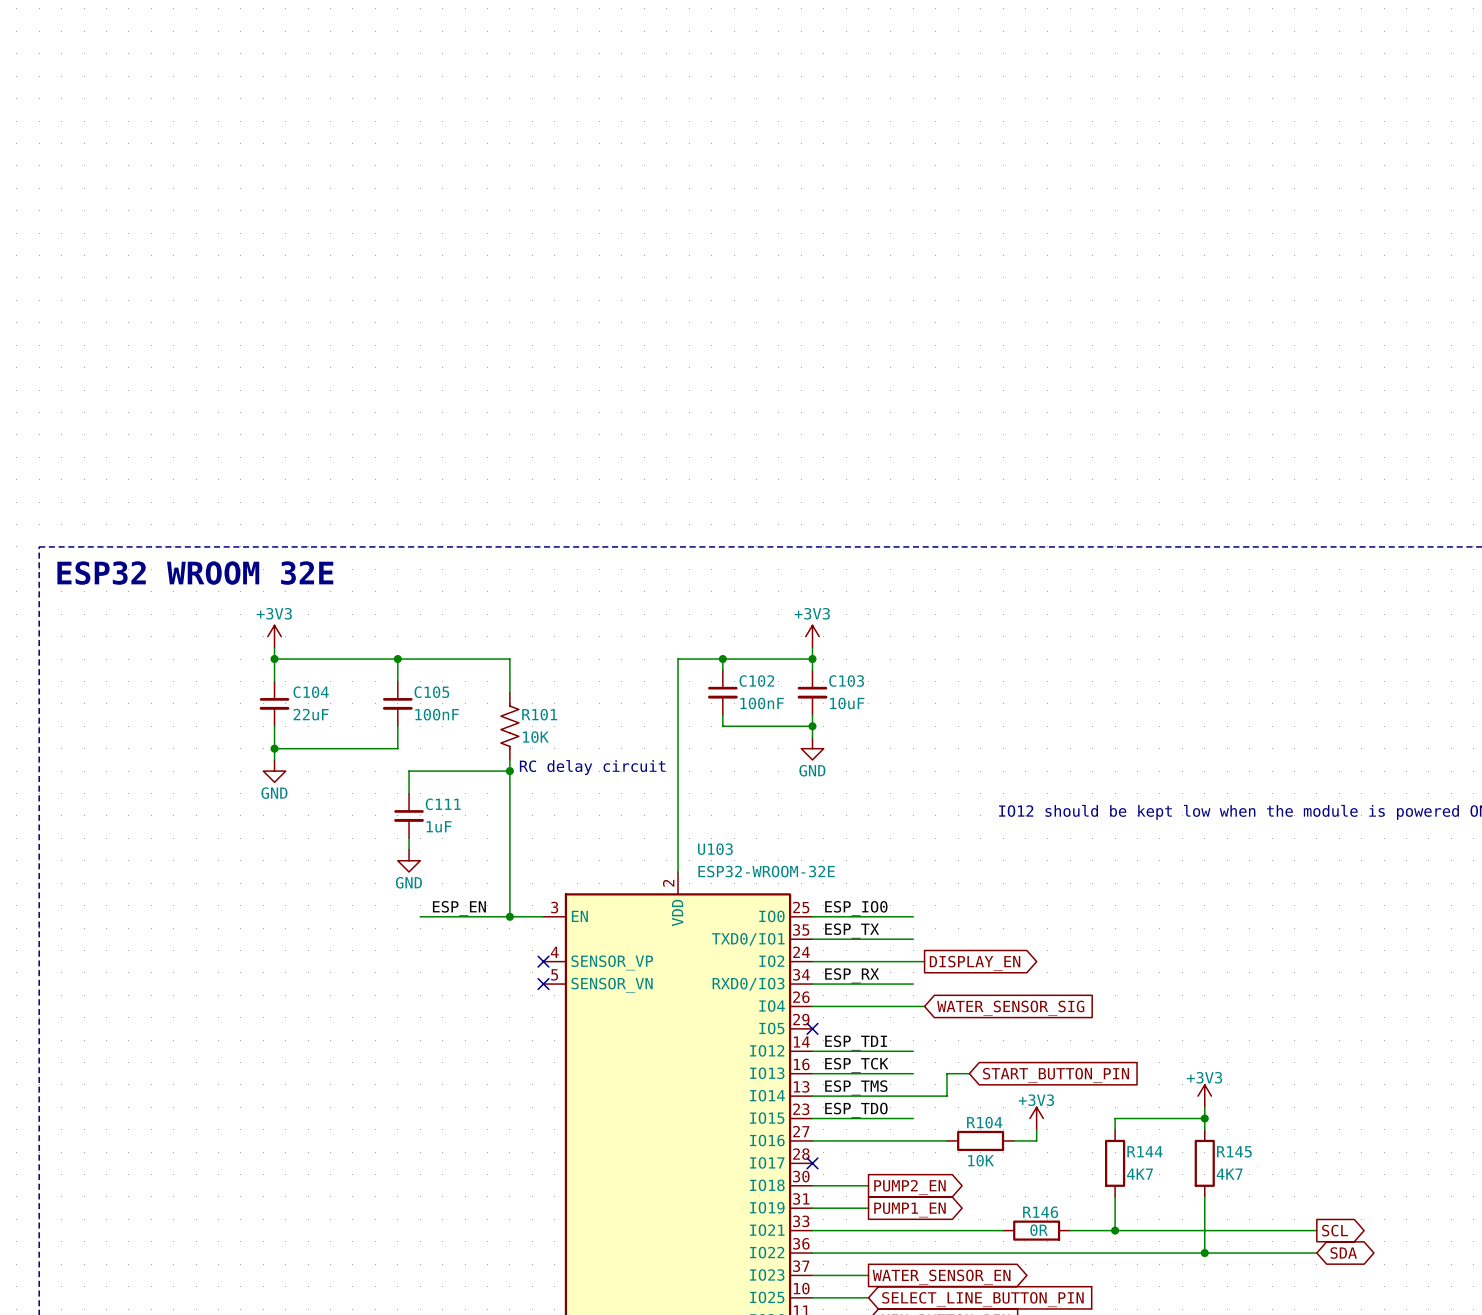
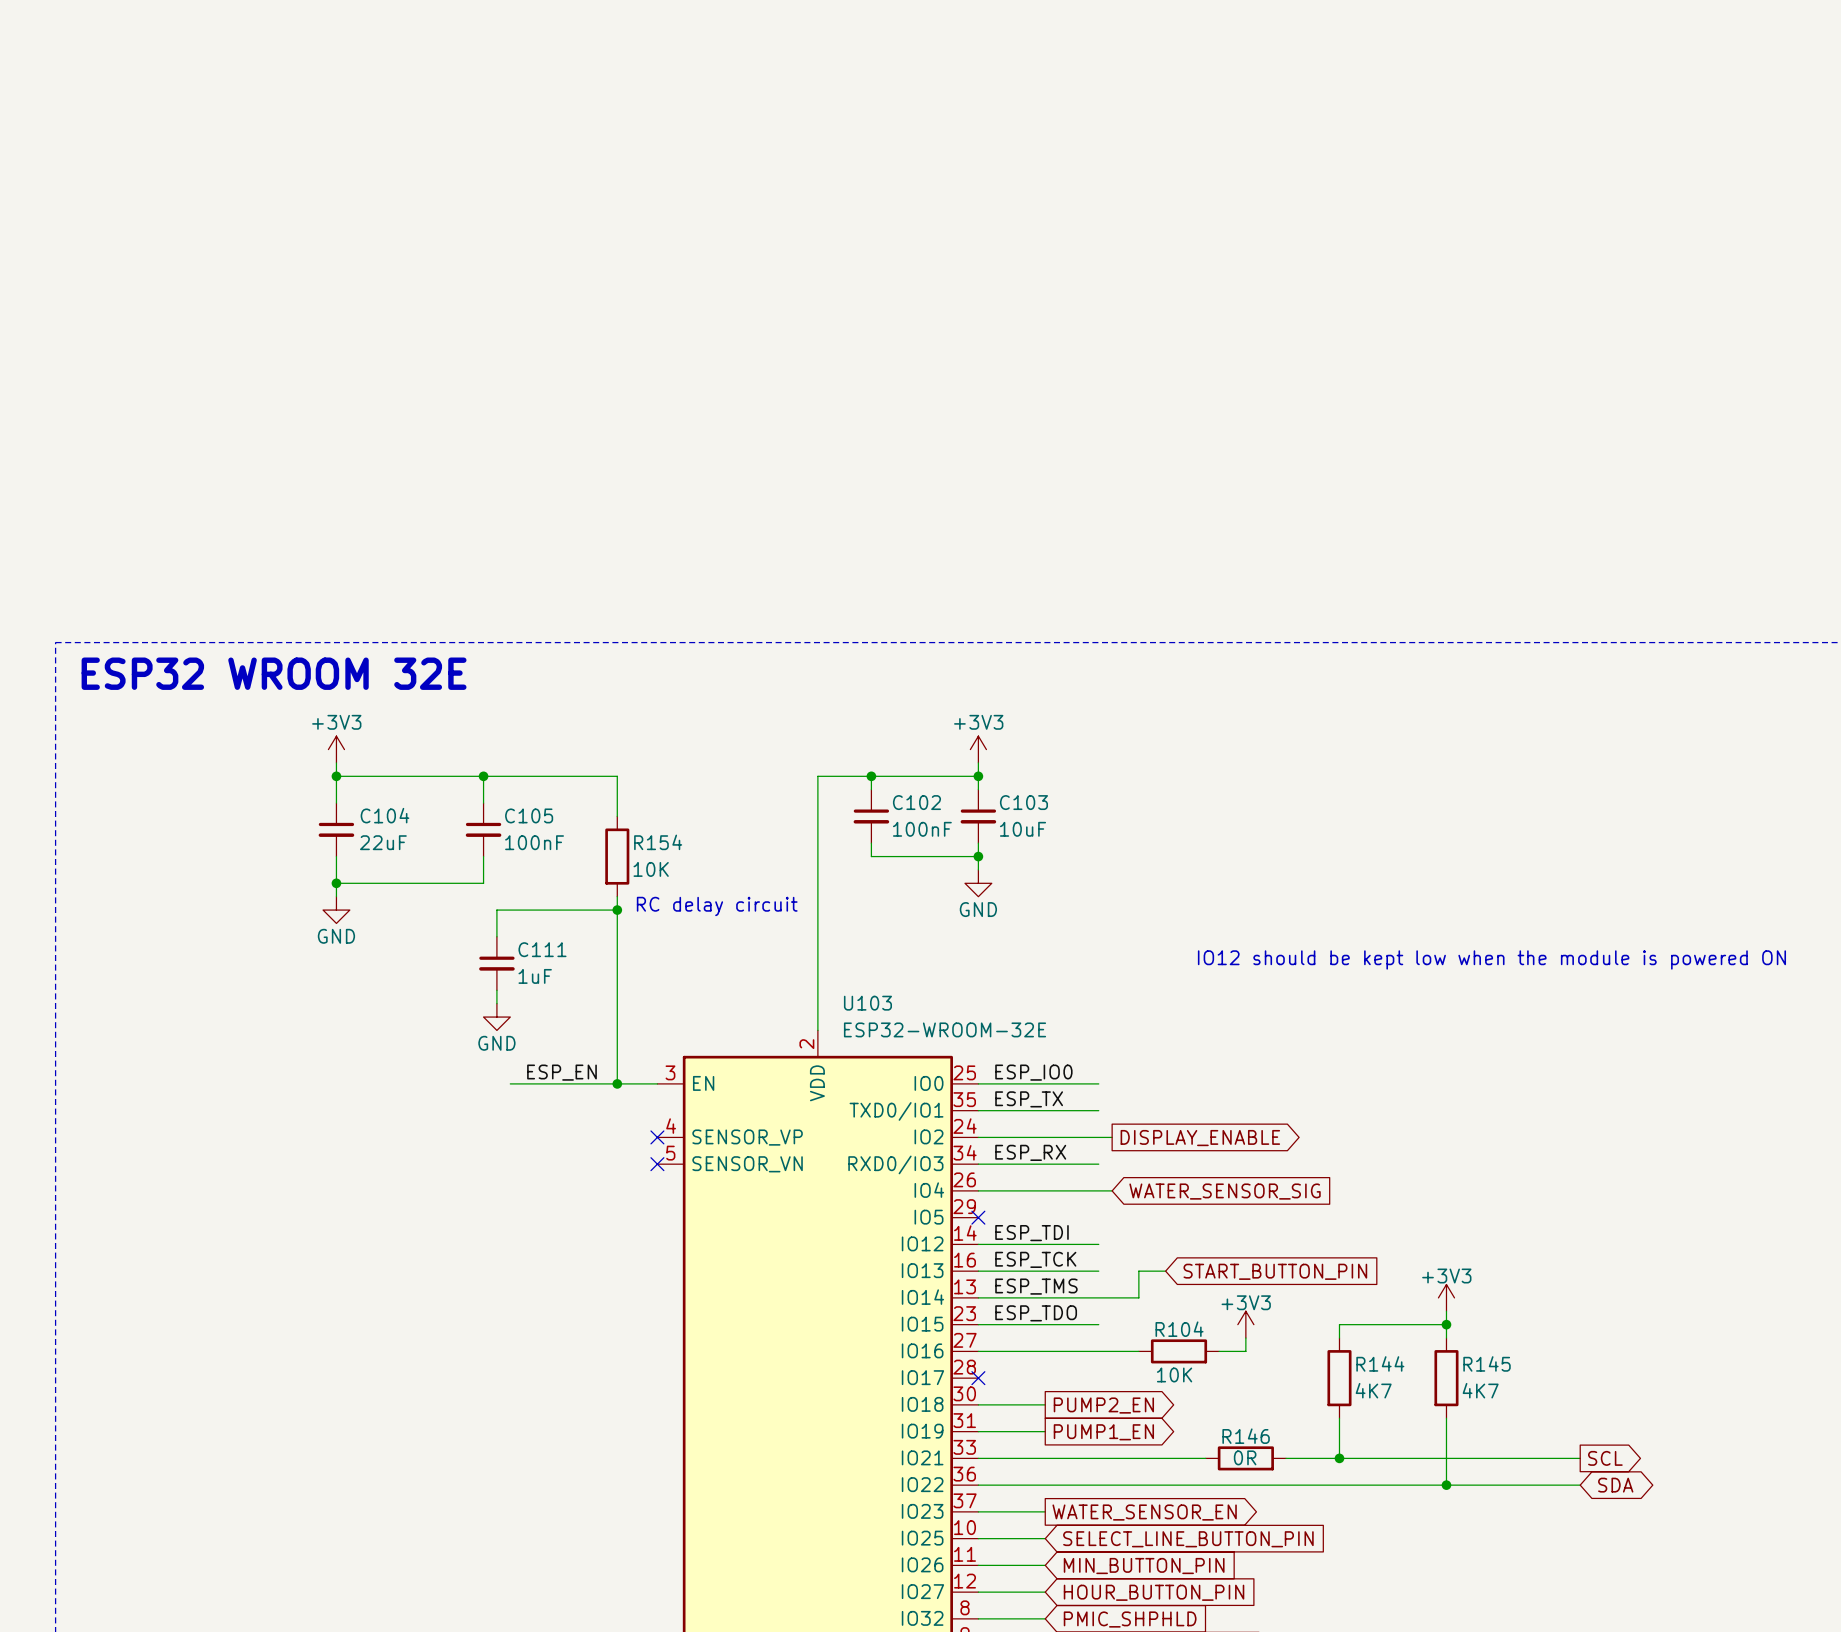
R101: 10K (509, 726) -> none
R154: none -> 10K (617, 856)
global label: DISPLAY_EN (975, 963) -> DISPLAY_ENABLE (1200, 1138)

